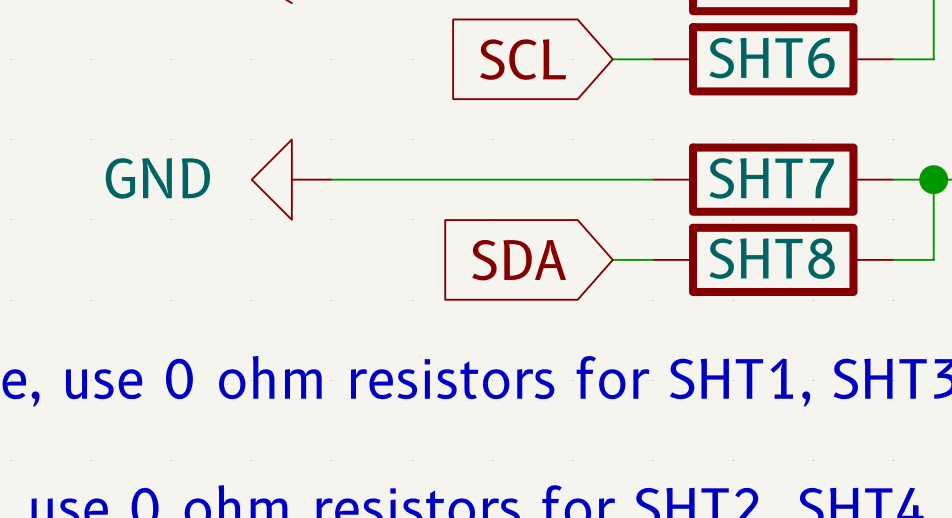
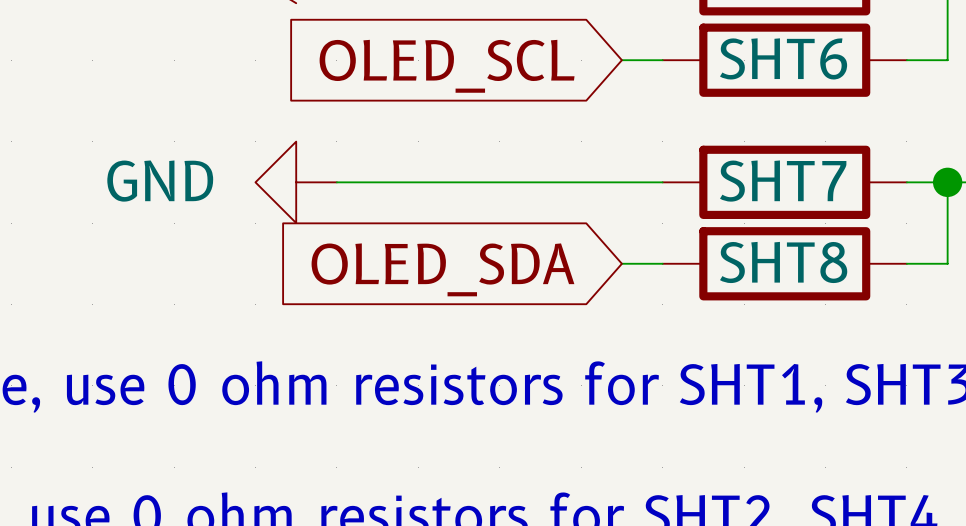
global label: SCL (523, 59) -> OLED_SCL (447, 66)
global label: SDA (519, 260) -> OLED_SDA (442, 269)

